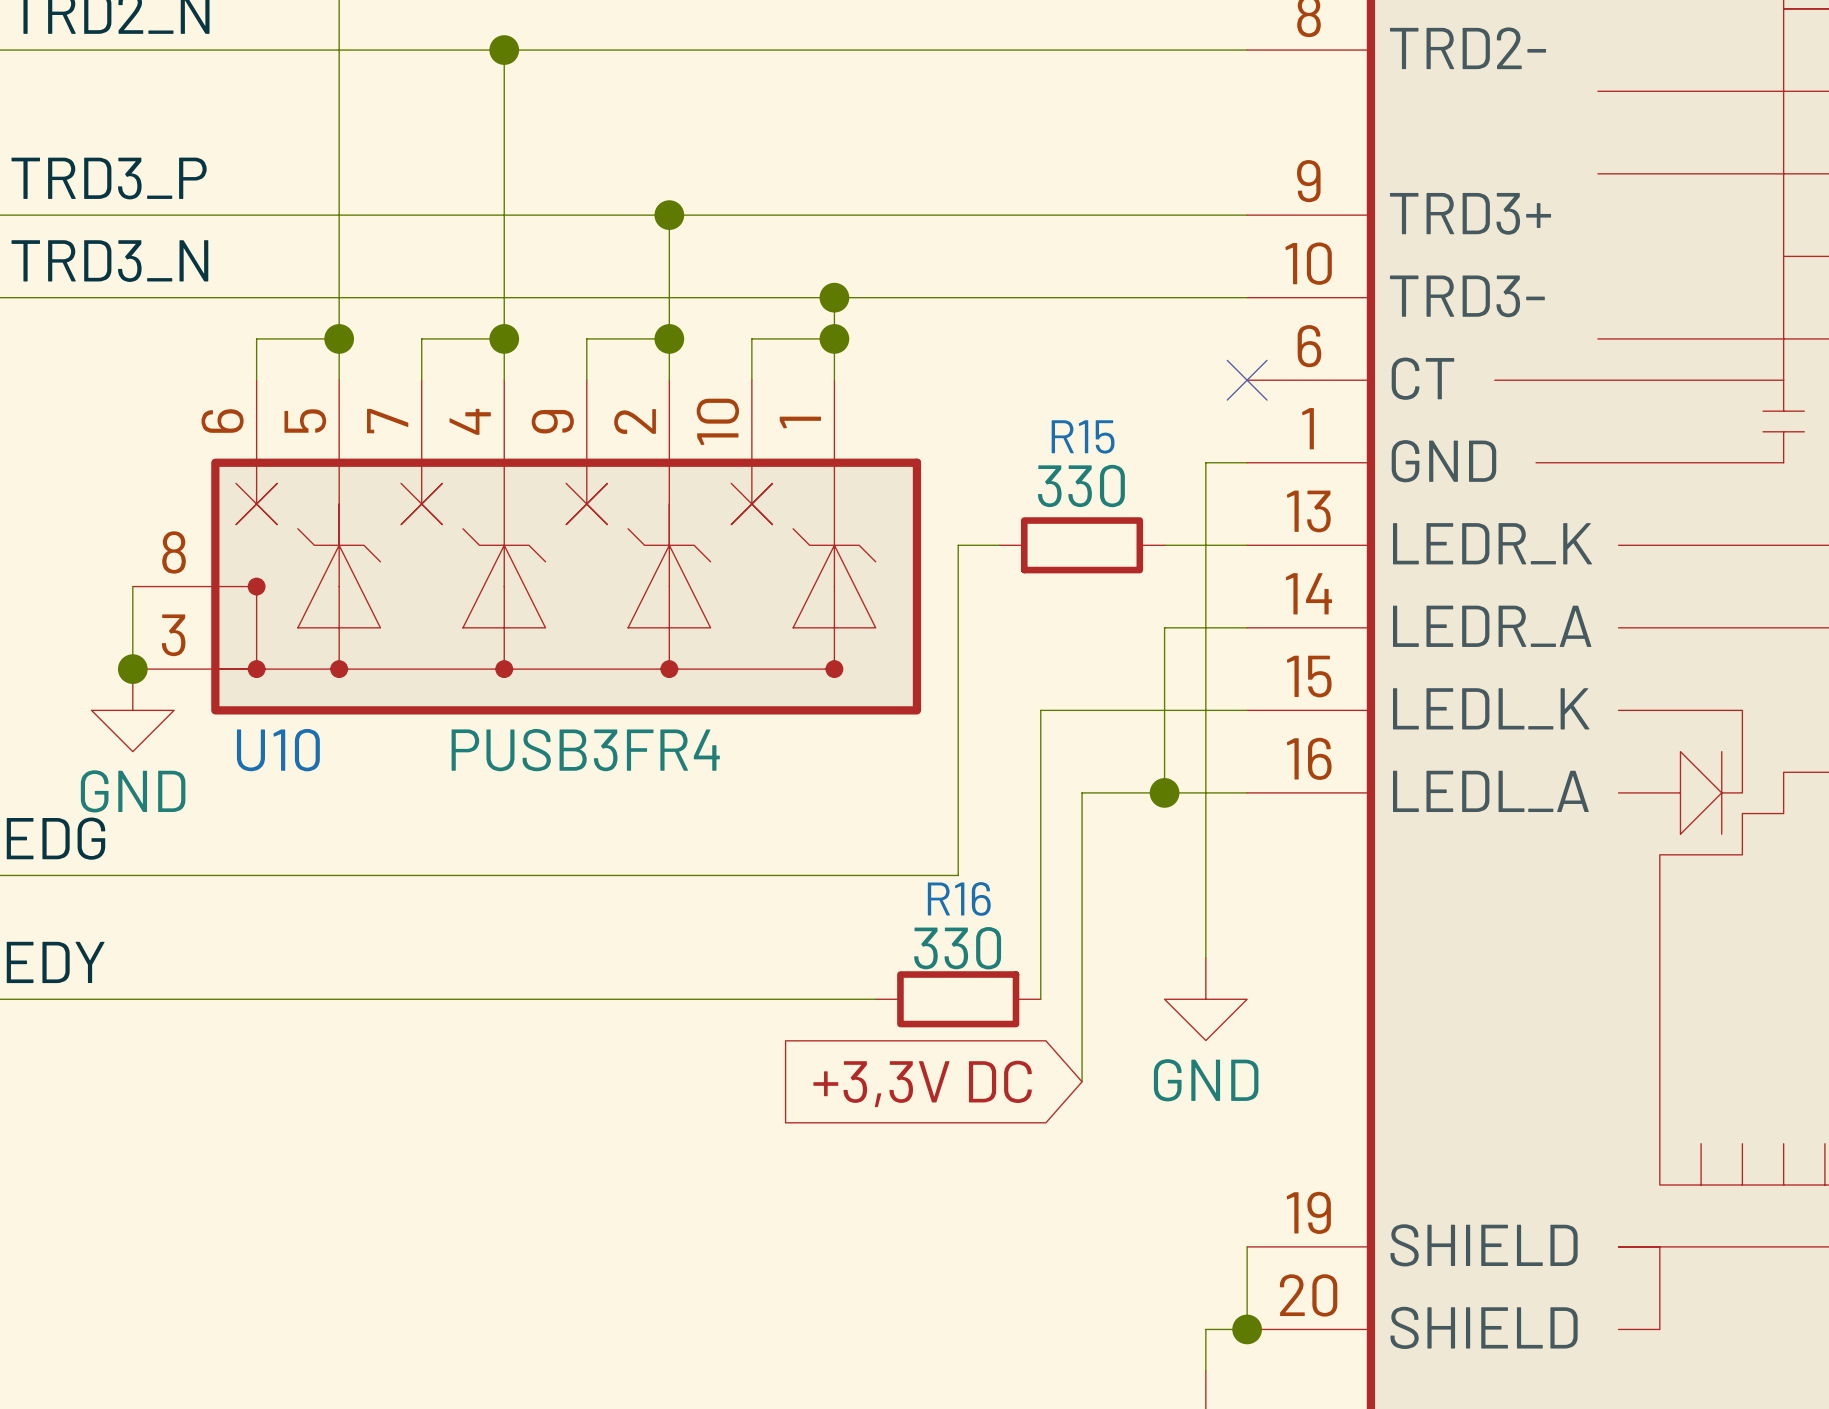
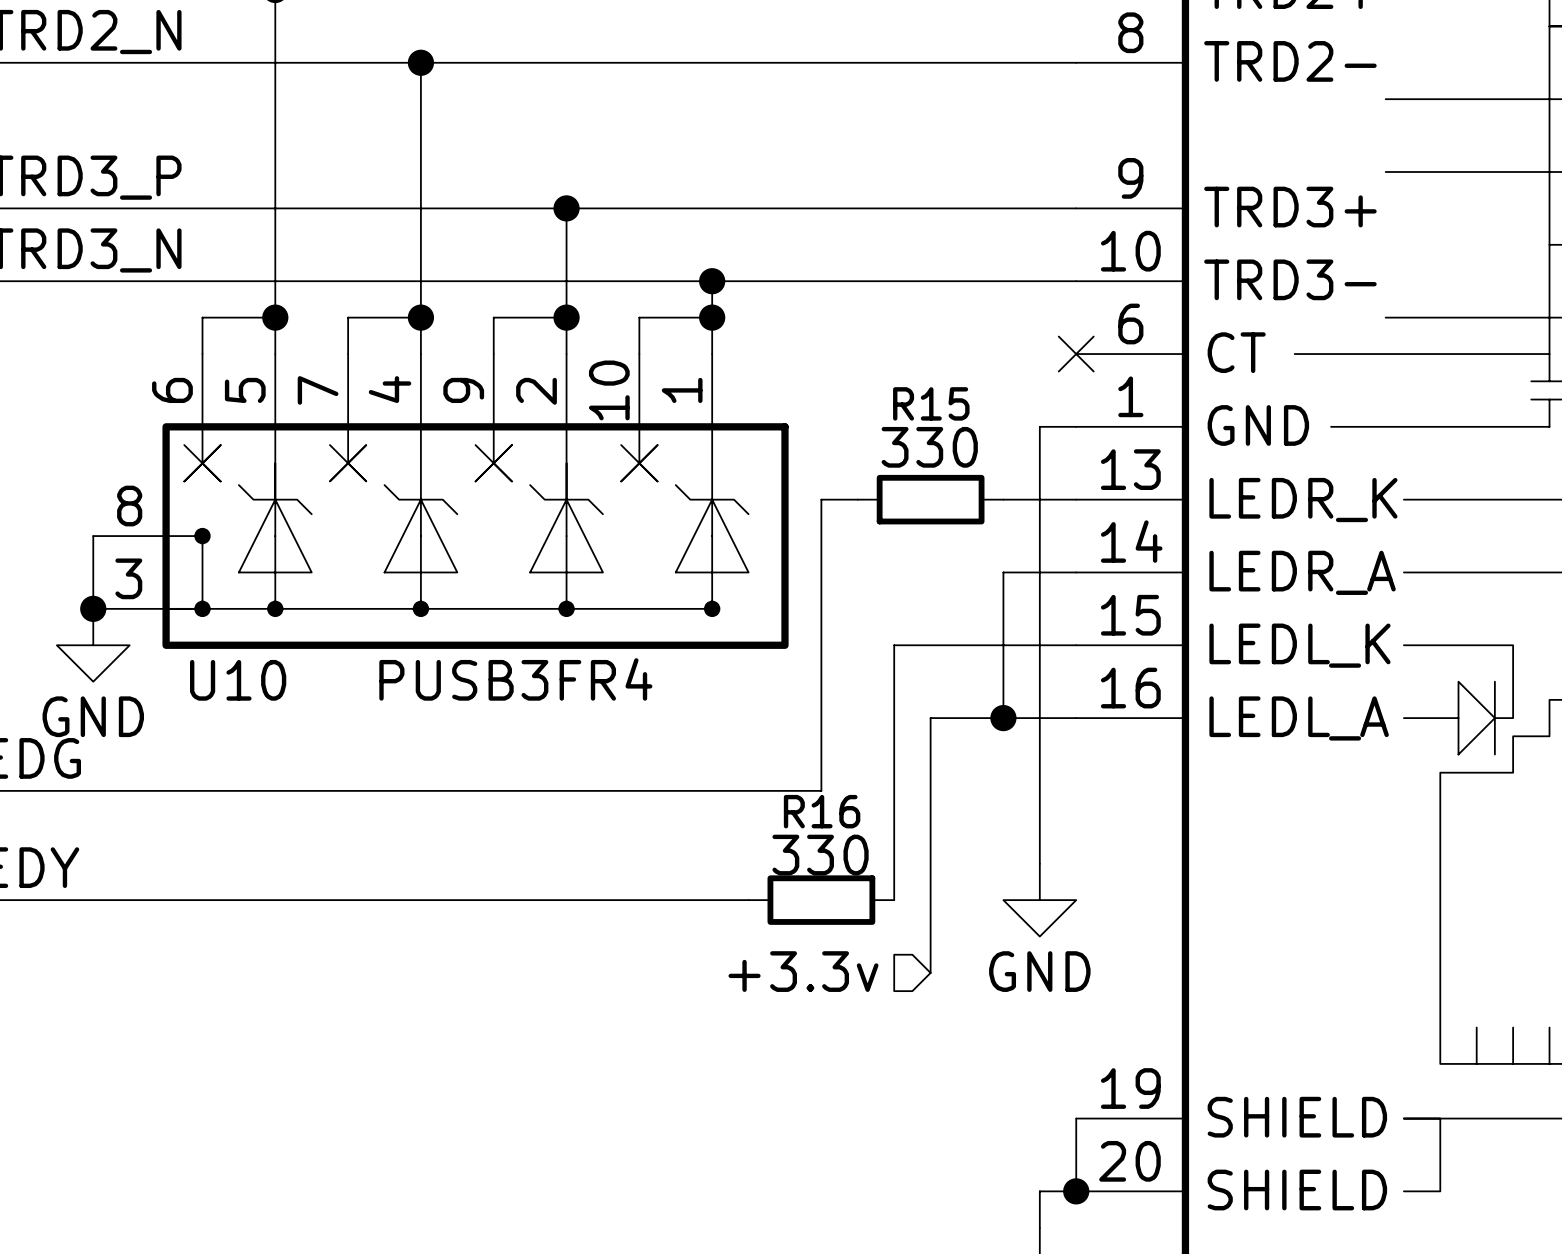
hierarchical label: none -> +3.3v (803, 971)
global label: +3,3V DC (922, 1083) -> none

